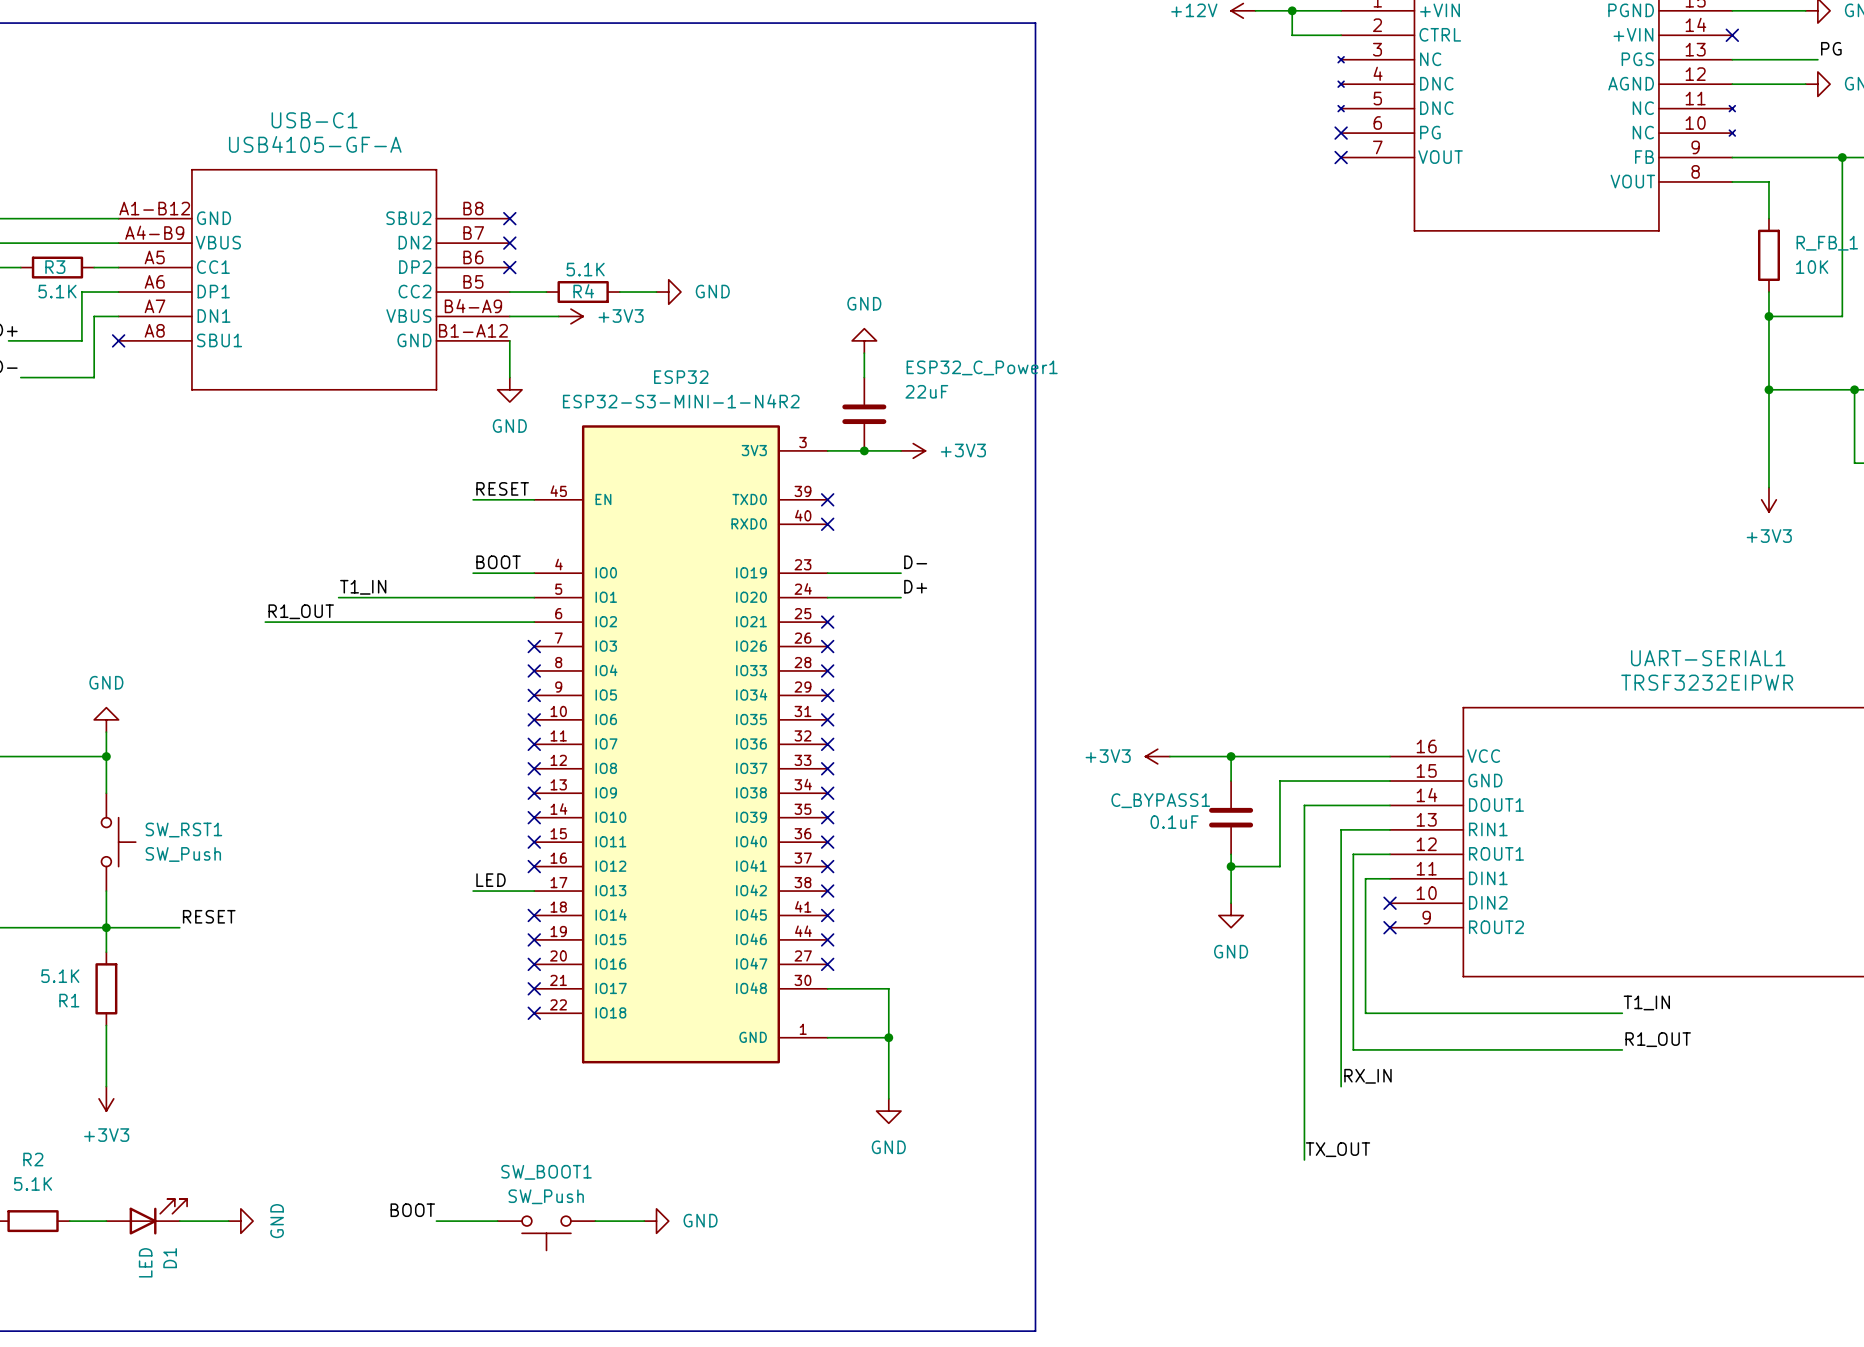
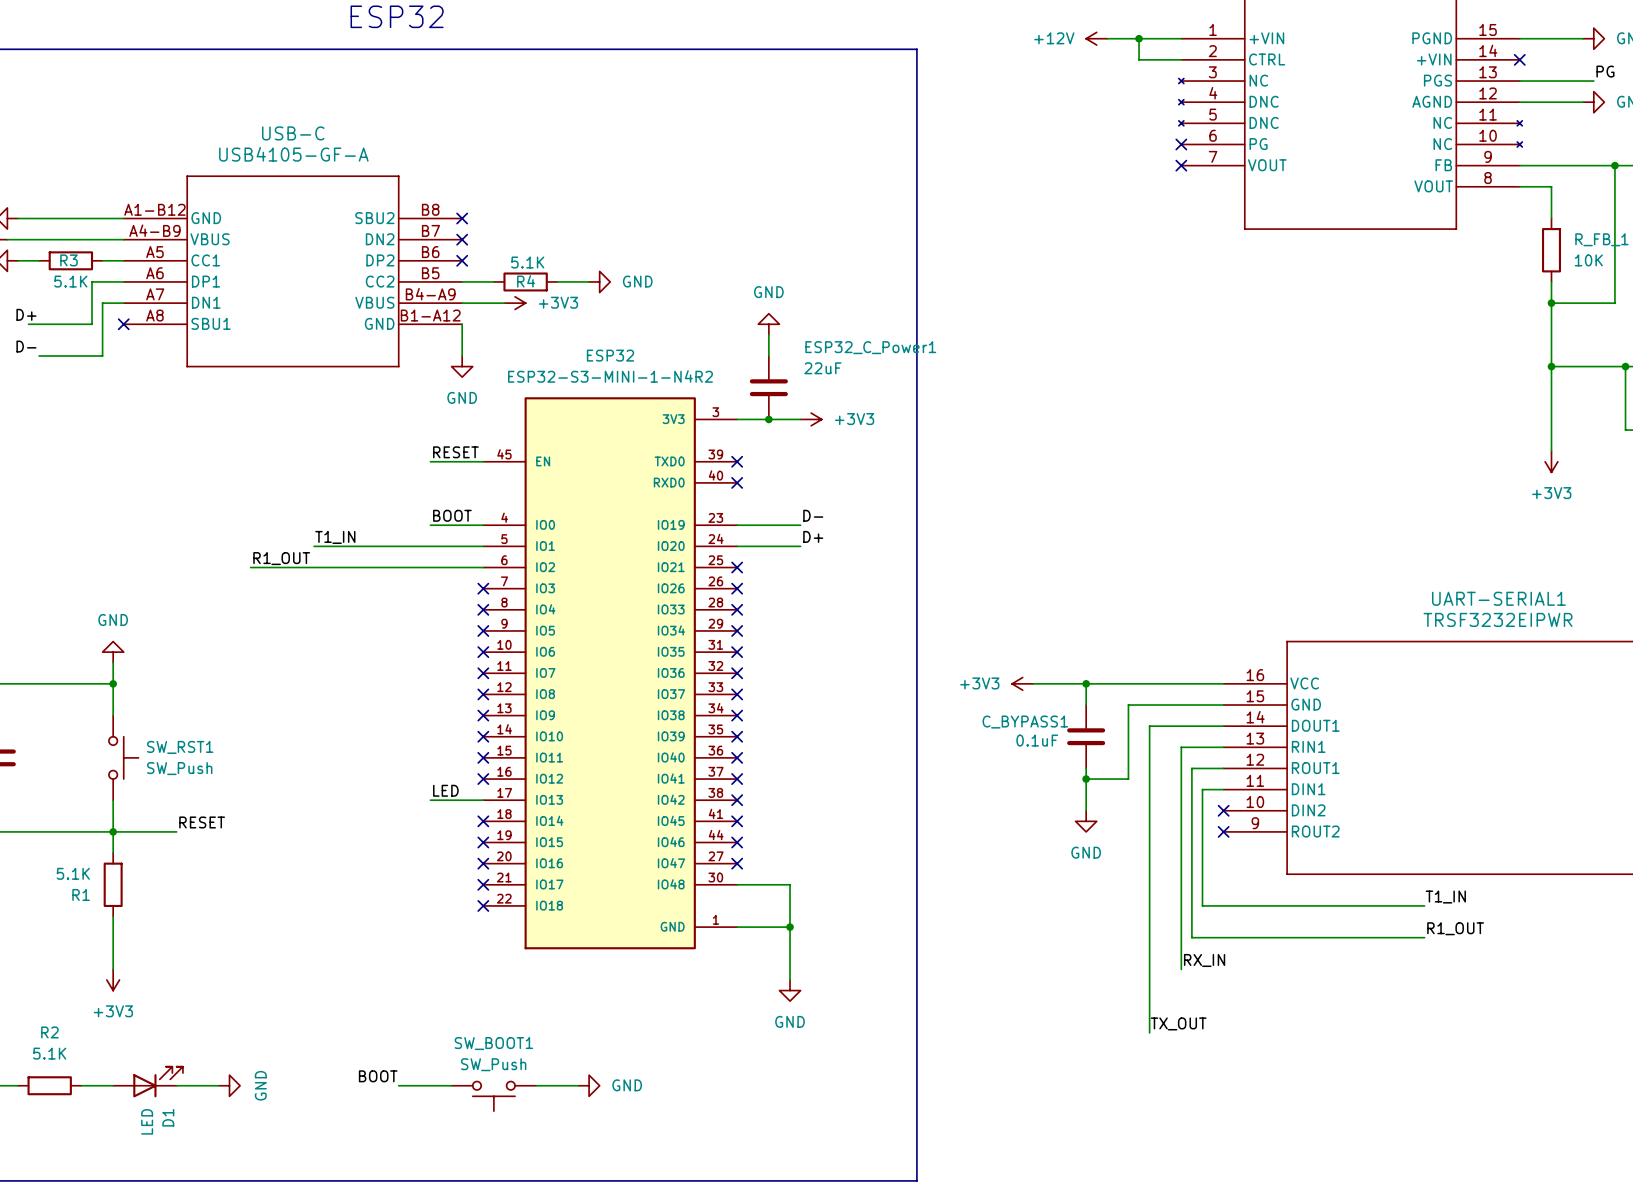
USB-C1 name: USB-C1 (314, 120) -> USB-C (293, 133)

